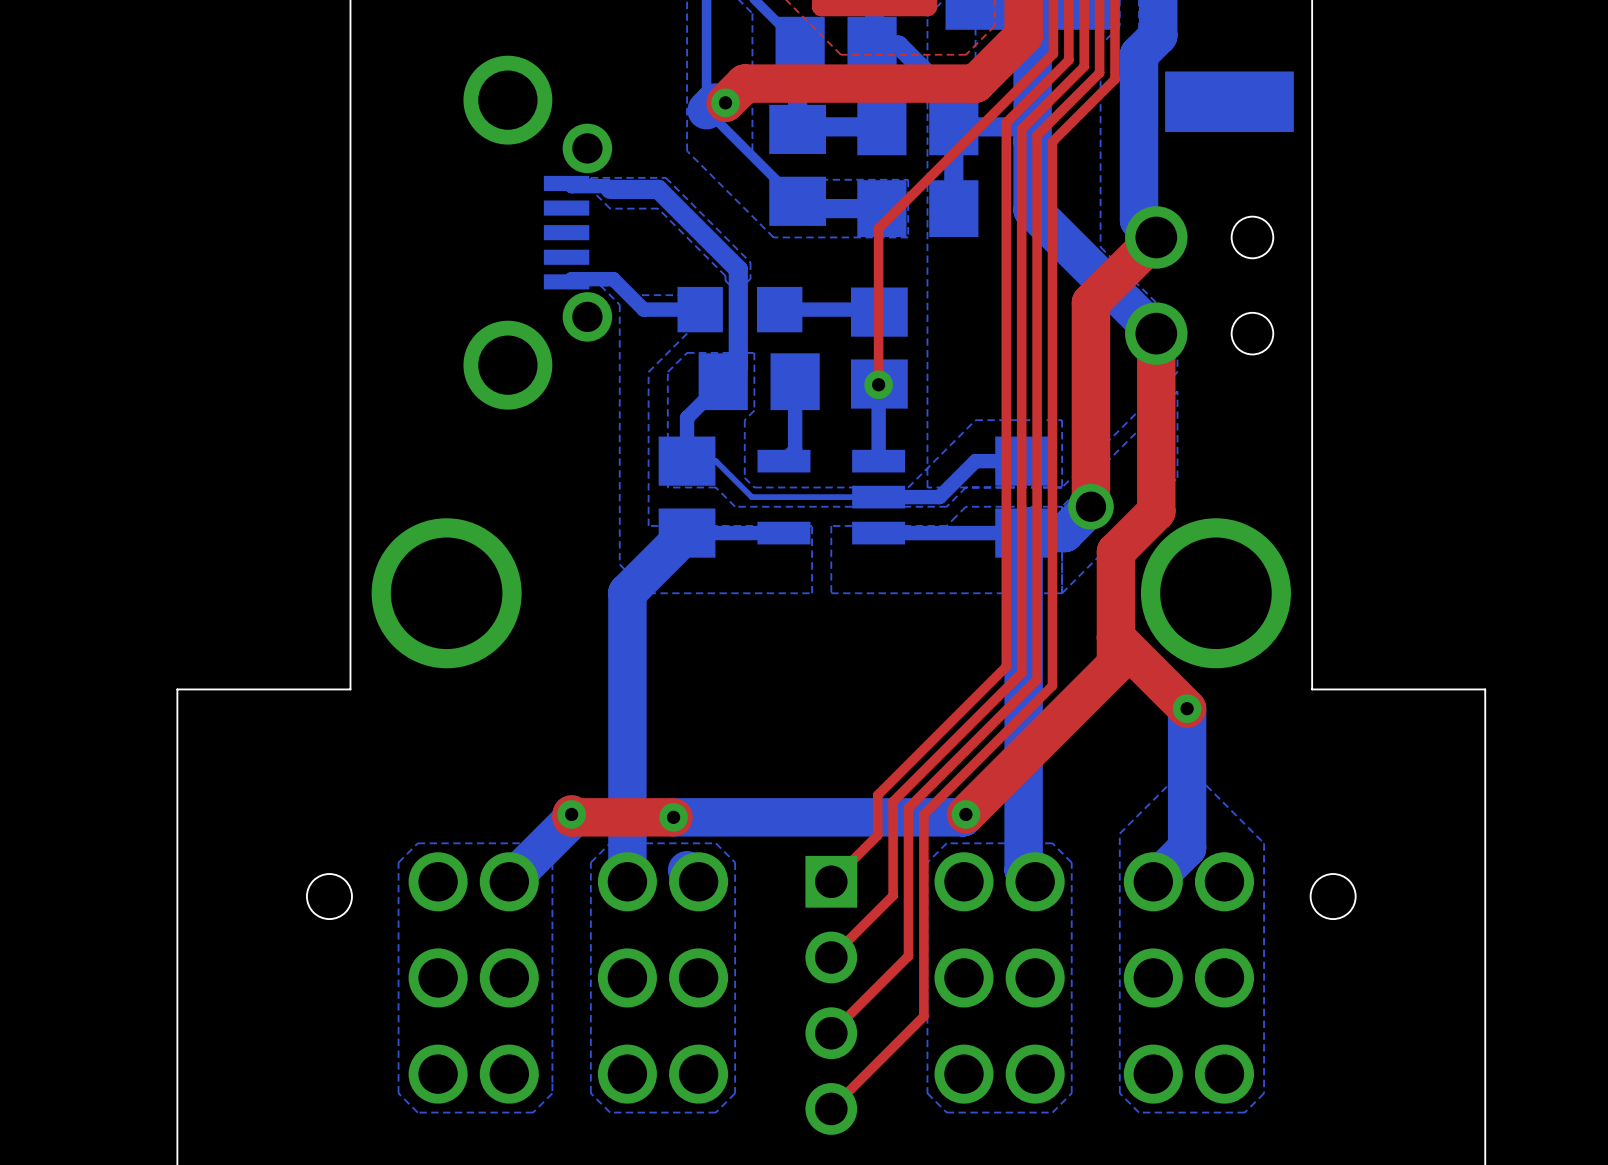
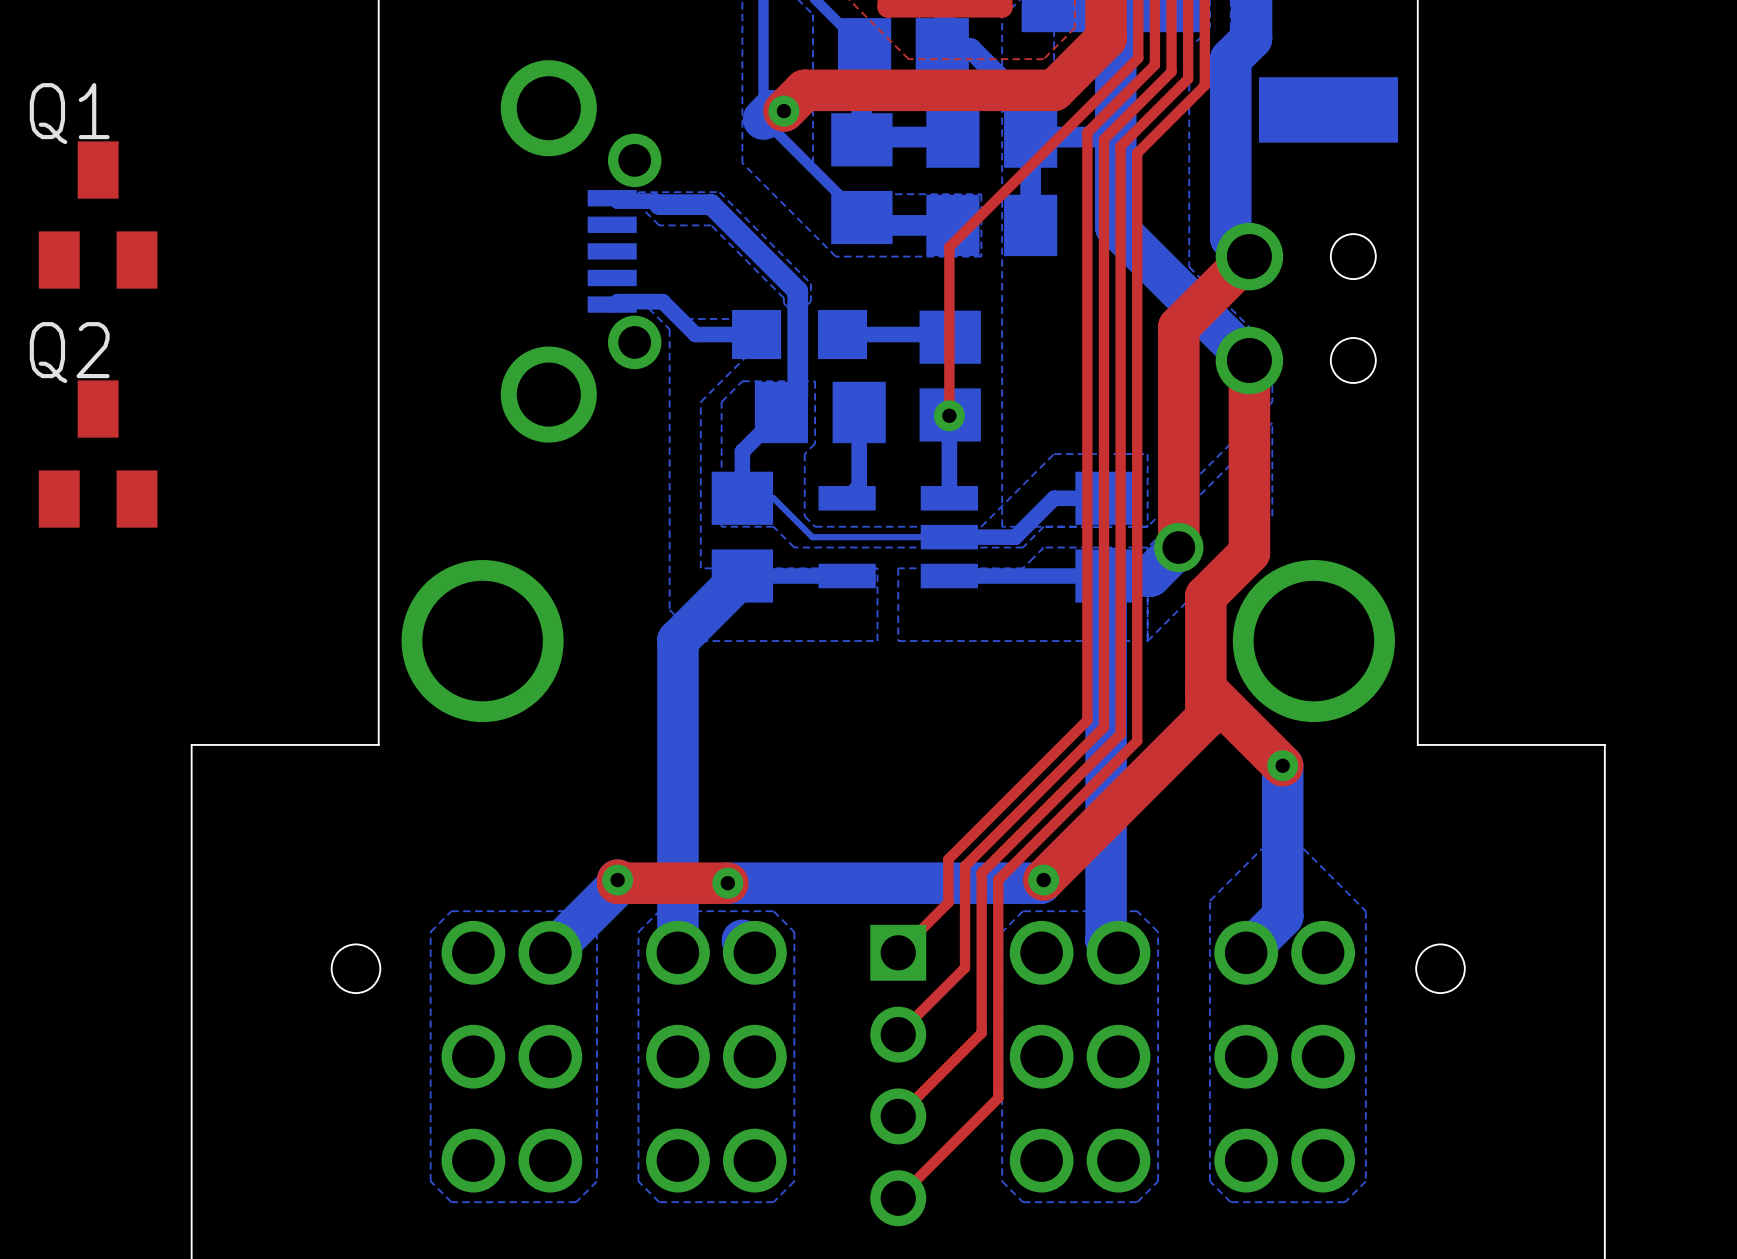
Q1: none -> (98, 215)
Q2: none -> (98, 454)

